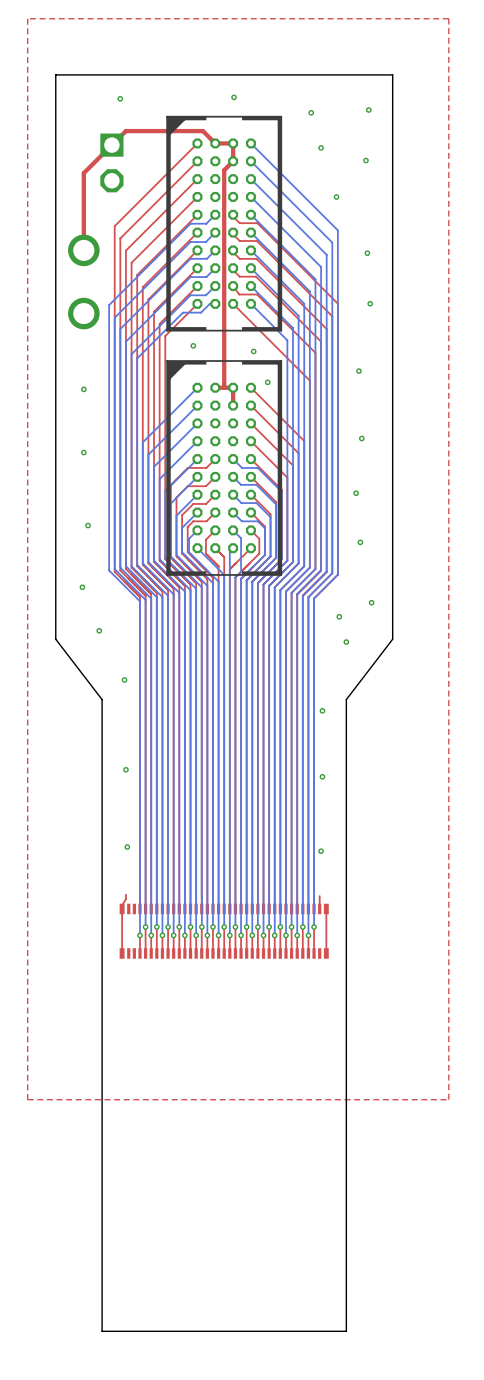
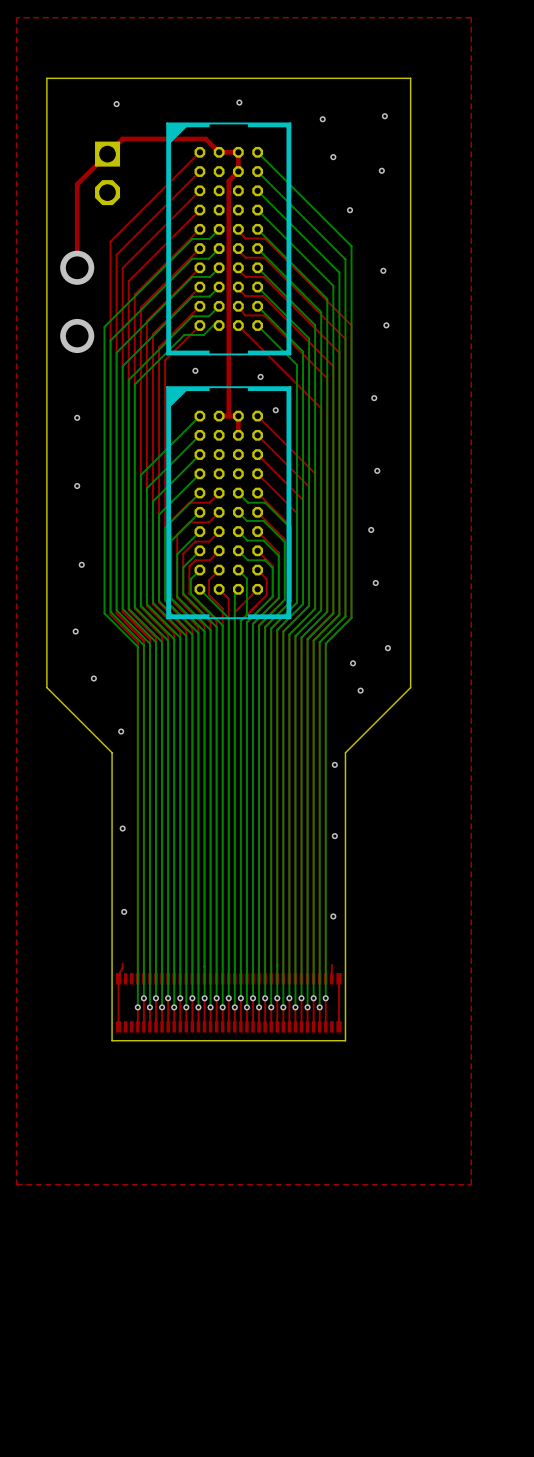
board edge: (392, 639) (346, 699) (346, 1331) (102, 1331) (102, 699) (55, 639) -> (410, 687) (345, 752) (345, 1040) (112, 1040) (112, 752) (46, 687)

